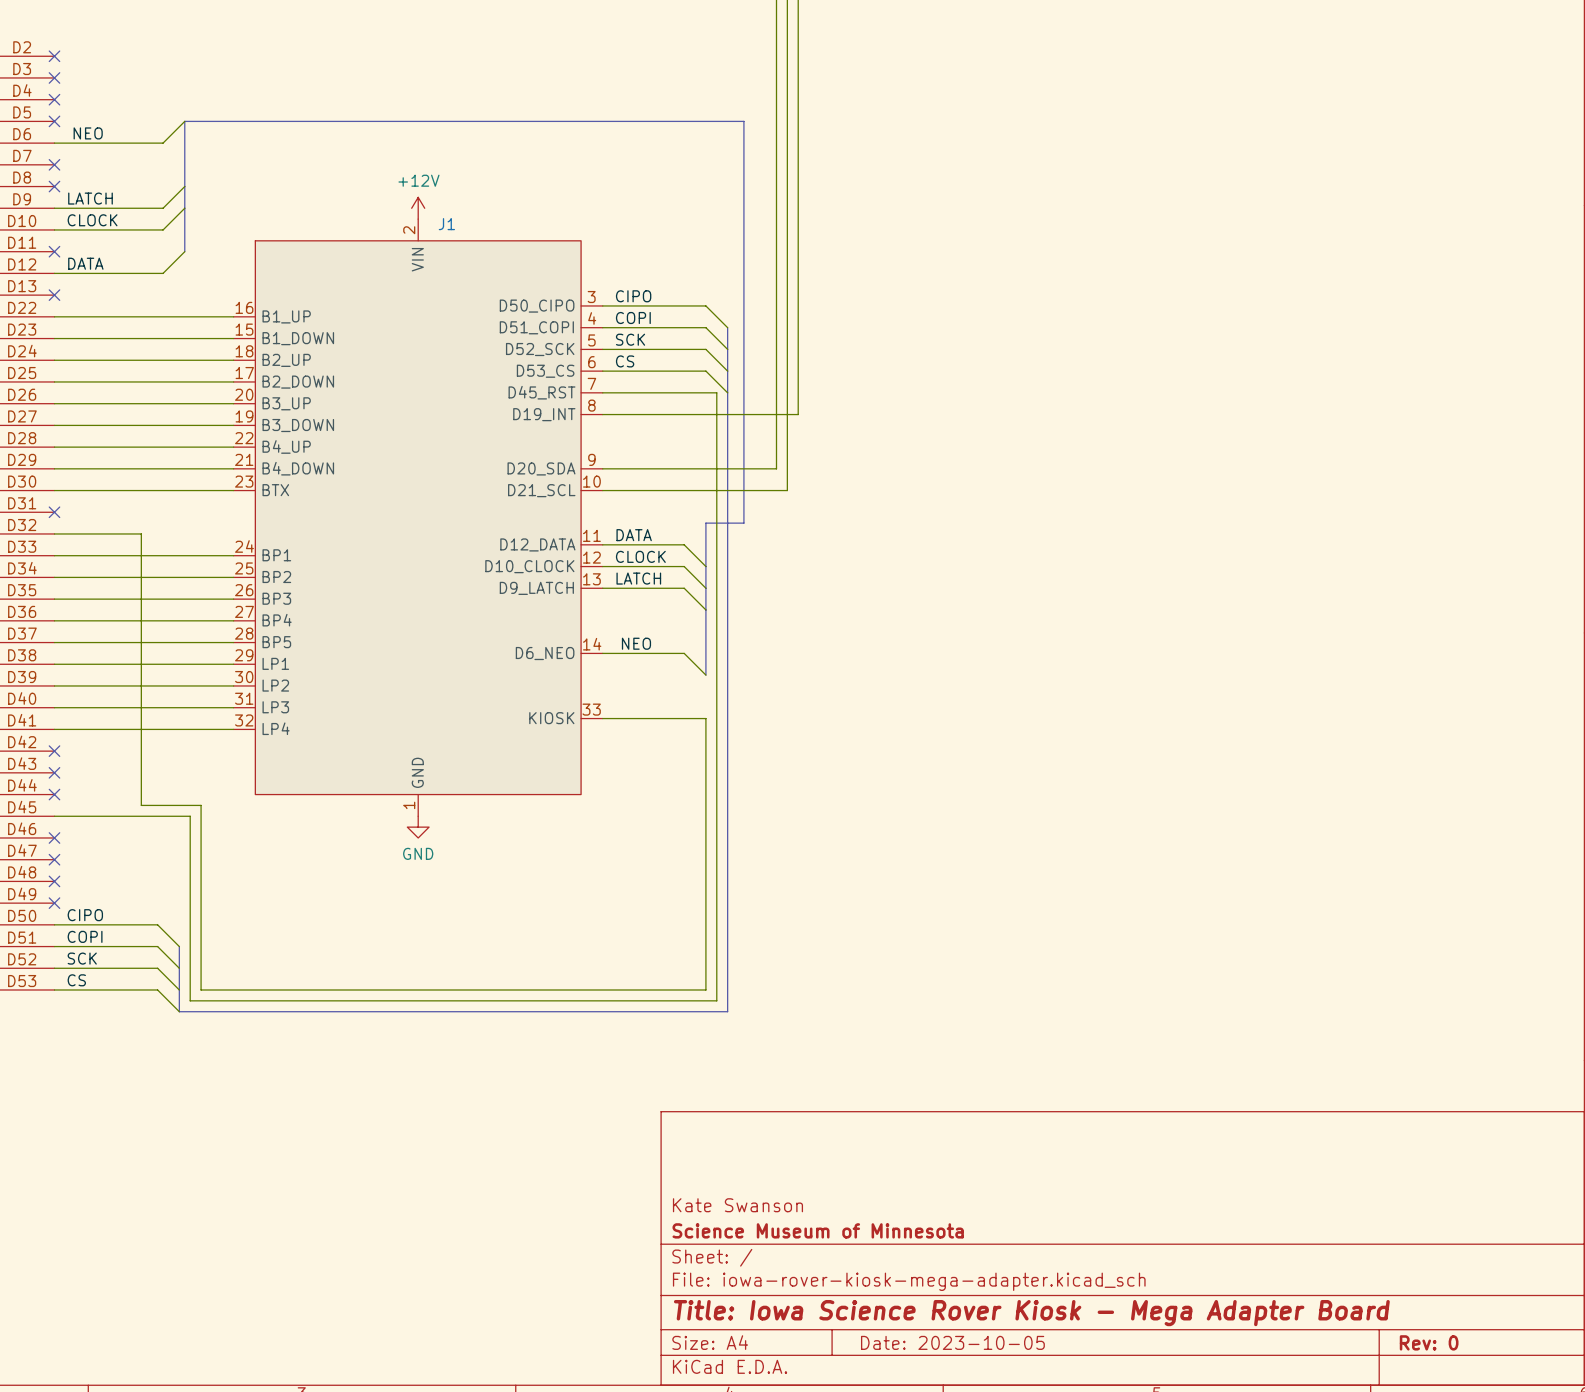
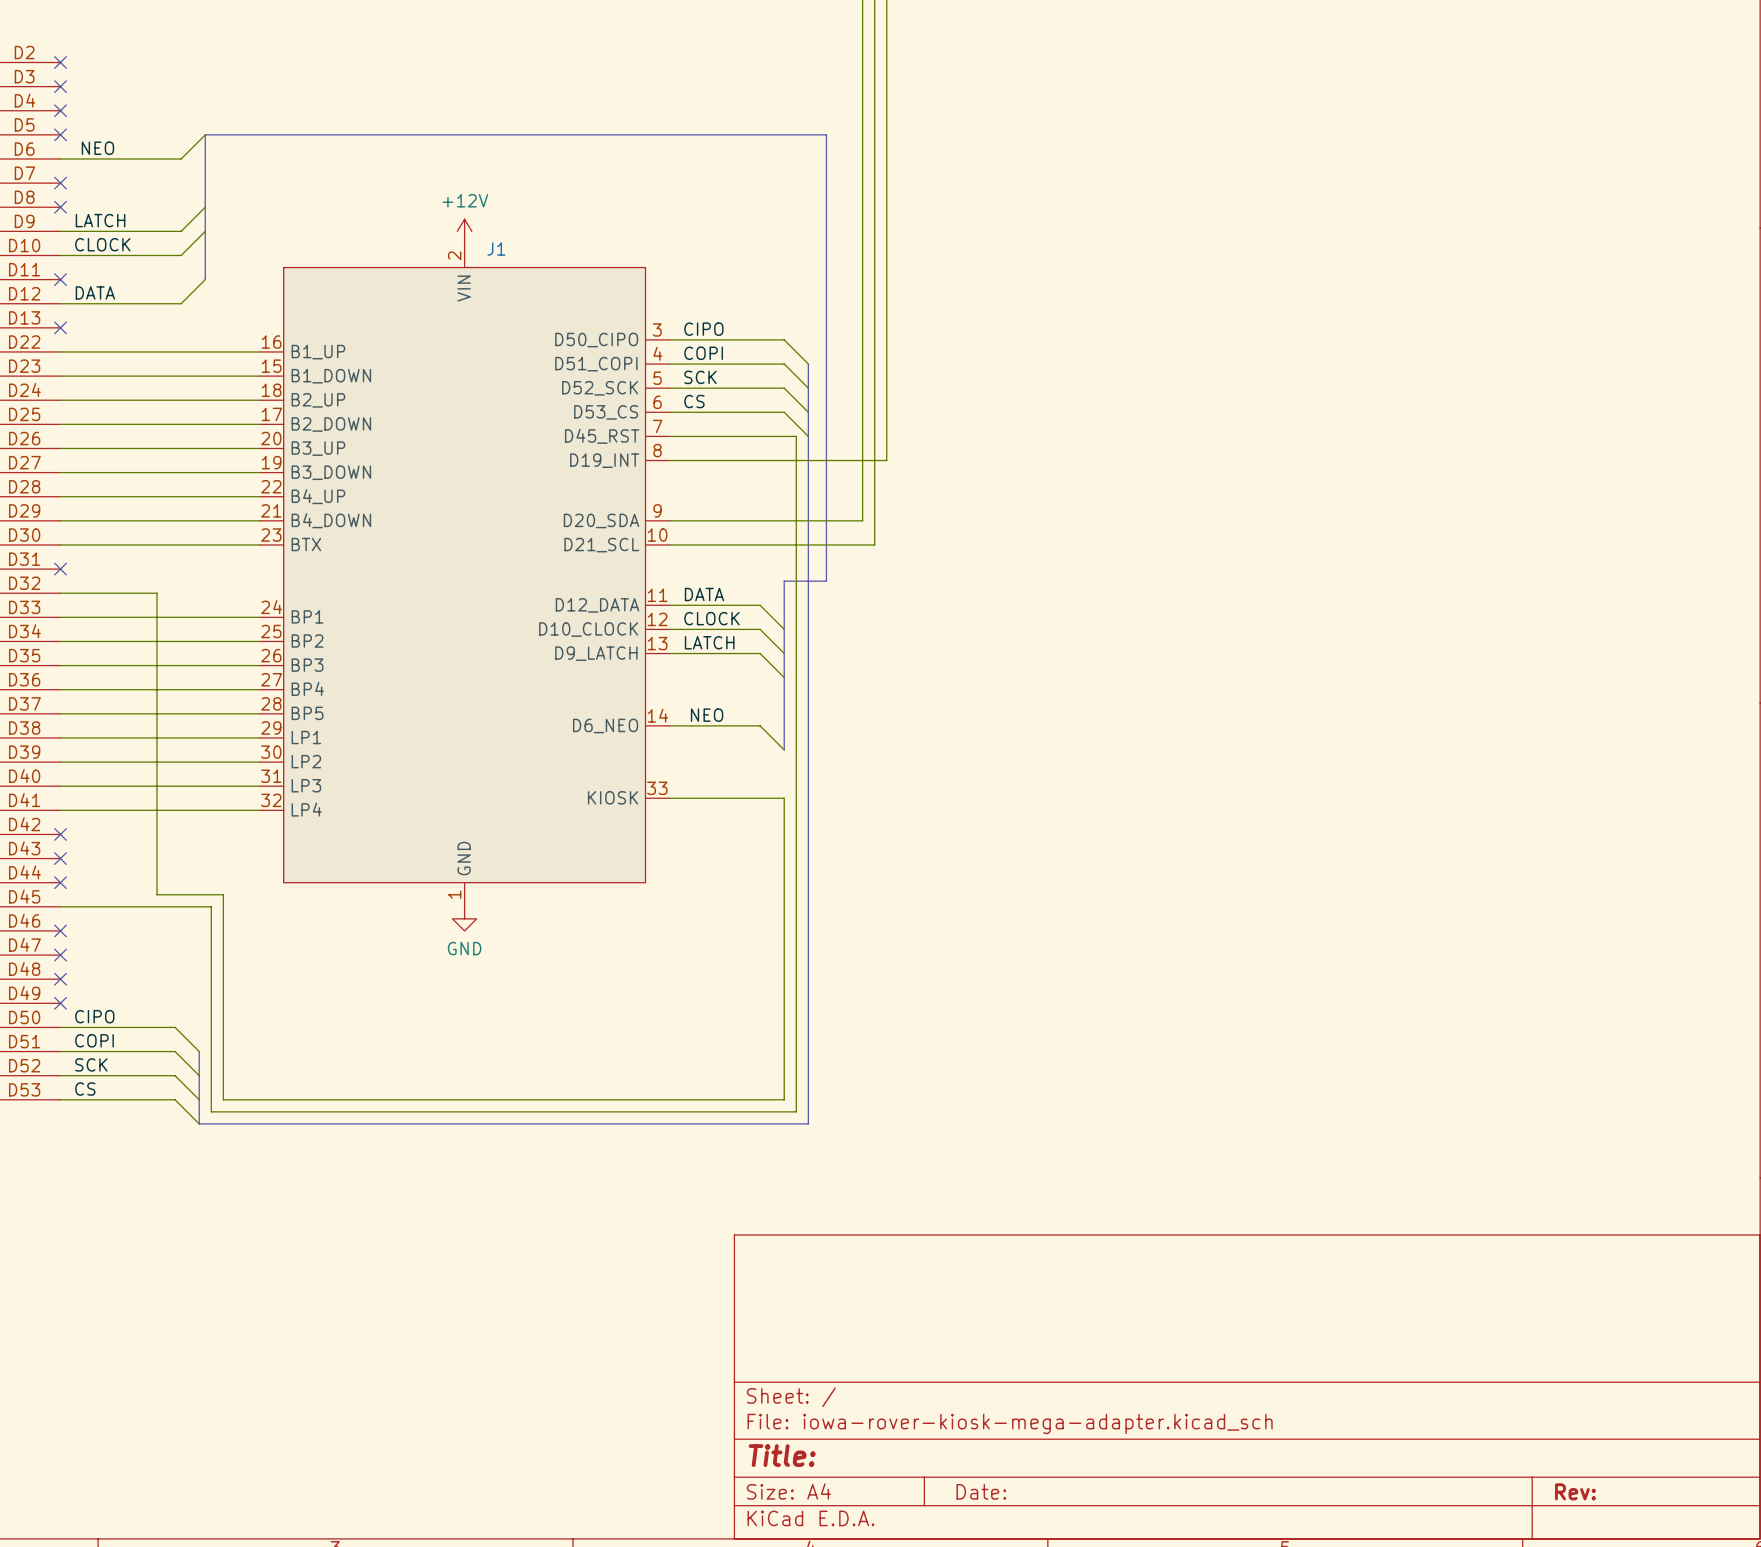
title block: Kate Swanson (737, 1205) -> none
title block: Science Museum of Minnesota (818, 1230) -> none
title block: Title: Iowa Science Rover Kiosk - Mega Adapter Board (1031, 1313) -> Title: (782, 1455)
title block: Date: 2023-10-05 (952, 1342) -> Date: (981, 1491)
title block: Rev: 0 (1429, 1342) -> Rev: (1575, 1491)

